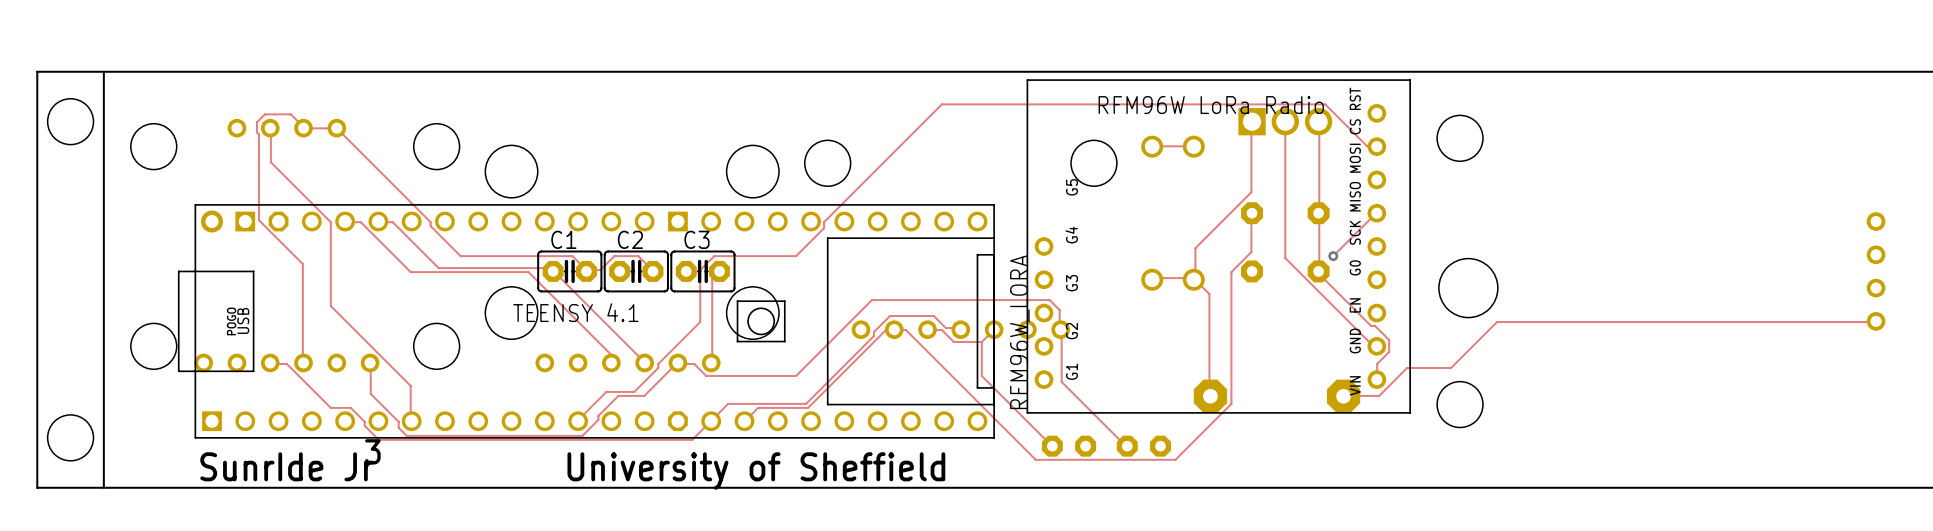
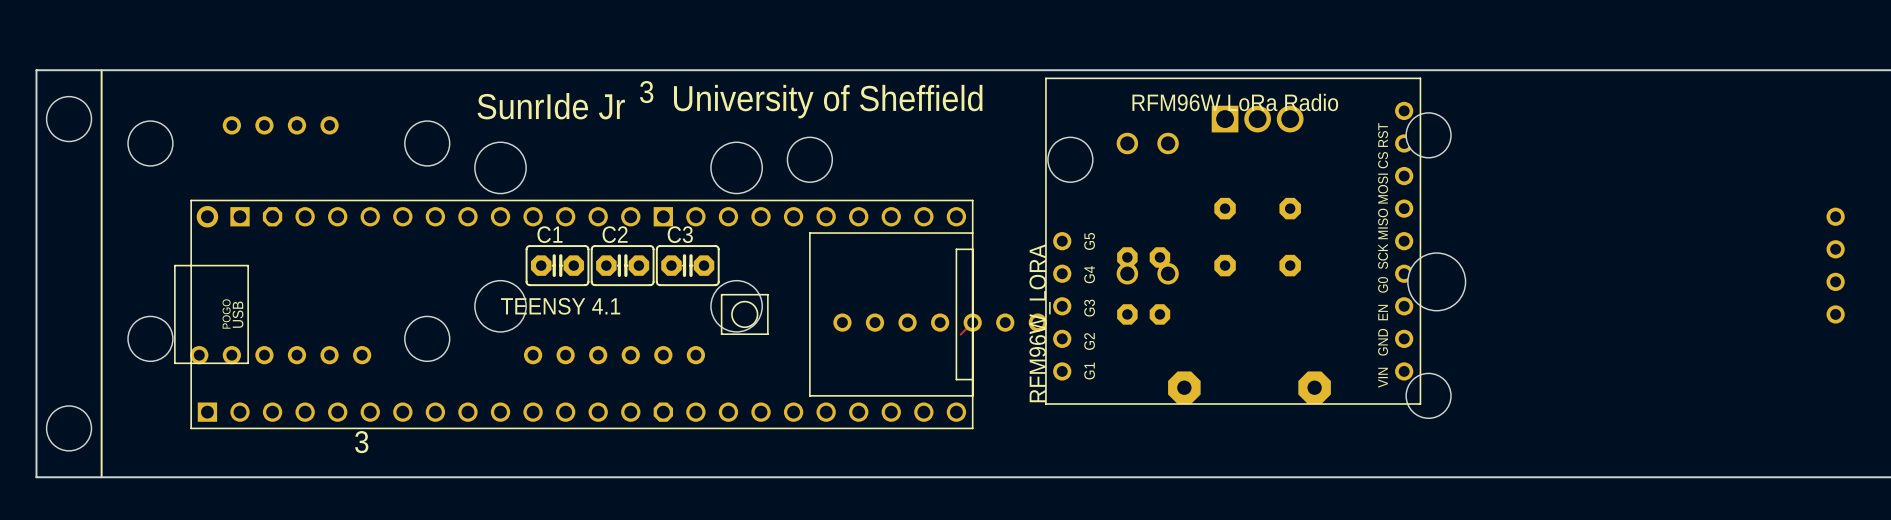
text: none -> 3 (646, 92)
text: none -> University of Sheffield (828, 101)
text: none -> SunrIde Jr (551, 106)
track: (1252, 121) (1251, 192) (1195, 248) (1195, 278) (1193, 279) -> none
track: (1285, 121) (1285, 258) (1375, 347) (1376, 346) -> none
track: (1318, 121) (1319, 270) (1317, 272) (1371, 326) (1375, 326) (1389, 340) (1389, 351) (1377, 363) (1376, 379) -> none
track: (270, 128) (270, 162) (330, 222) (330, 306) (410, 385) (411, 421) -> none
track: (1152, 146) (1193, 146) -> none
track: (1376, 146) (1367, 146) (1325, 104) (941, 104) (824, 222) (824, 228) (796, 256) (714, 256) (700, 270) (700, 322) (658, 363) (658, 367) (634, 391) (606, 391) (578, 421) -> none
track: (1252, 213) (1251, 252) (1231, 272) (1231, 403) (1175, 459) (1035, 459) (905, 330) (885, 330) (808, 407) (758, 407) (744, 421) -> none
track: (1376, 213) (1333, 256) -> none
track: (345, 221) (360, 222) (410, 272) (528, 272) (610, 353) (611, 362) -> none
track: (378, 221) (392, 222) (438, 268) (550, 268) (644, 362) -> none
part: (1218, 246) -> none
part: none -> (1233, 241)
via: (1333, 256) -> none
part: none -> (1143, 257)
track: (586, 270) (600, 270) (614, 256) (638, 256) (652, 271) -> none
track: (586, 270) (572, 256) (460, 256) (430, 226) (430, 222) (336, 128) (303, 128) (290, 114) (264, 114) (256, 122) (256, 132) (258, 134) (258, 220) (302, 264) (303, 362) -> none
track: (719, 271) (712, 278) (711, 362) -> none
track: (1152, 279) (1153, 278) (1193, 278) (1193, 279) -> none
track: (1193, 279) (1209, 294) (1210, 396) -> none
part: none -> (1143, 314)
track: (1876, 321) (1496, 322) (1451, 367) (1407, 367) (1379, 395) (1343, 396) -> none
track: (927, 329) (941, 330) (953, 342) (981, 342) (981, 375) (1052, 446) -> none
track: (960, 329) (959, 328) (945, 328) (933, 316) (889, 316) (873, 332) (873, 336) (806, 403) (728, 403) (692, 439) (378, 439) (350, 407) (330, 407) (286, 363) (270, 362) -> none
track: (370, 362) (370, 393) (398, 421) (398, 427) (406, 435) (582, 435) (618, 395) (644, 395) (677, 362) (694, 363) (706, 375) (796, 375) (871, 300) (1049, 300) (1059, 310) (1061, 381) (1127, 446) -> none
part: (1069, 446) -> none
part: (1143, 446) -> none
text: SunrIde Jr (287, 466) -> none
text: University of Sheffield (756, 471) -> none

